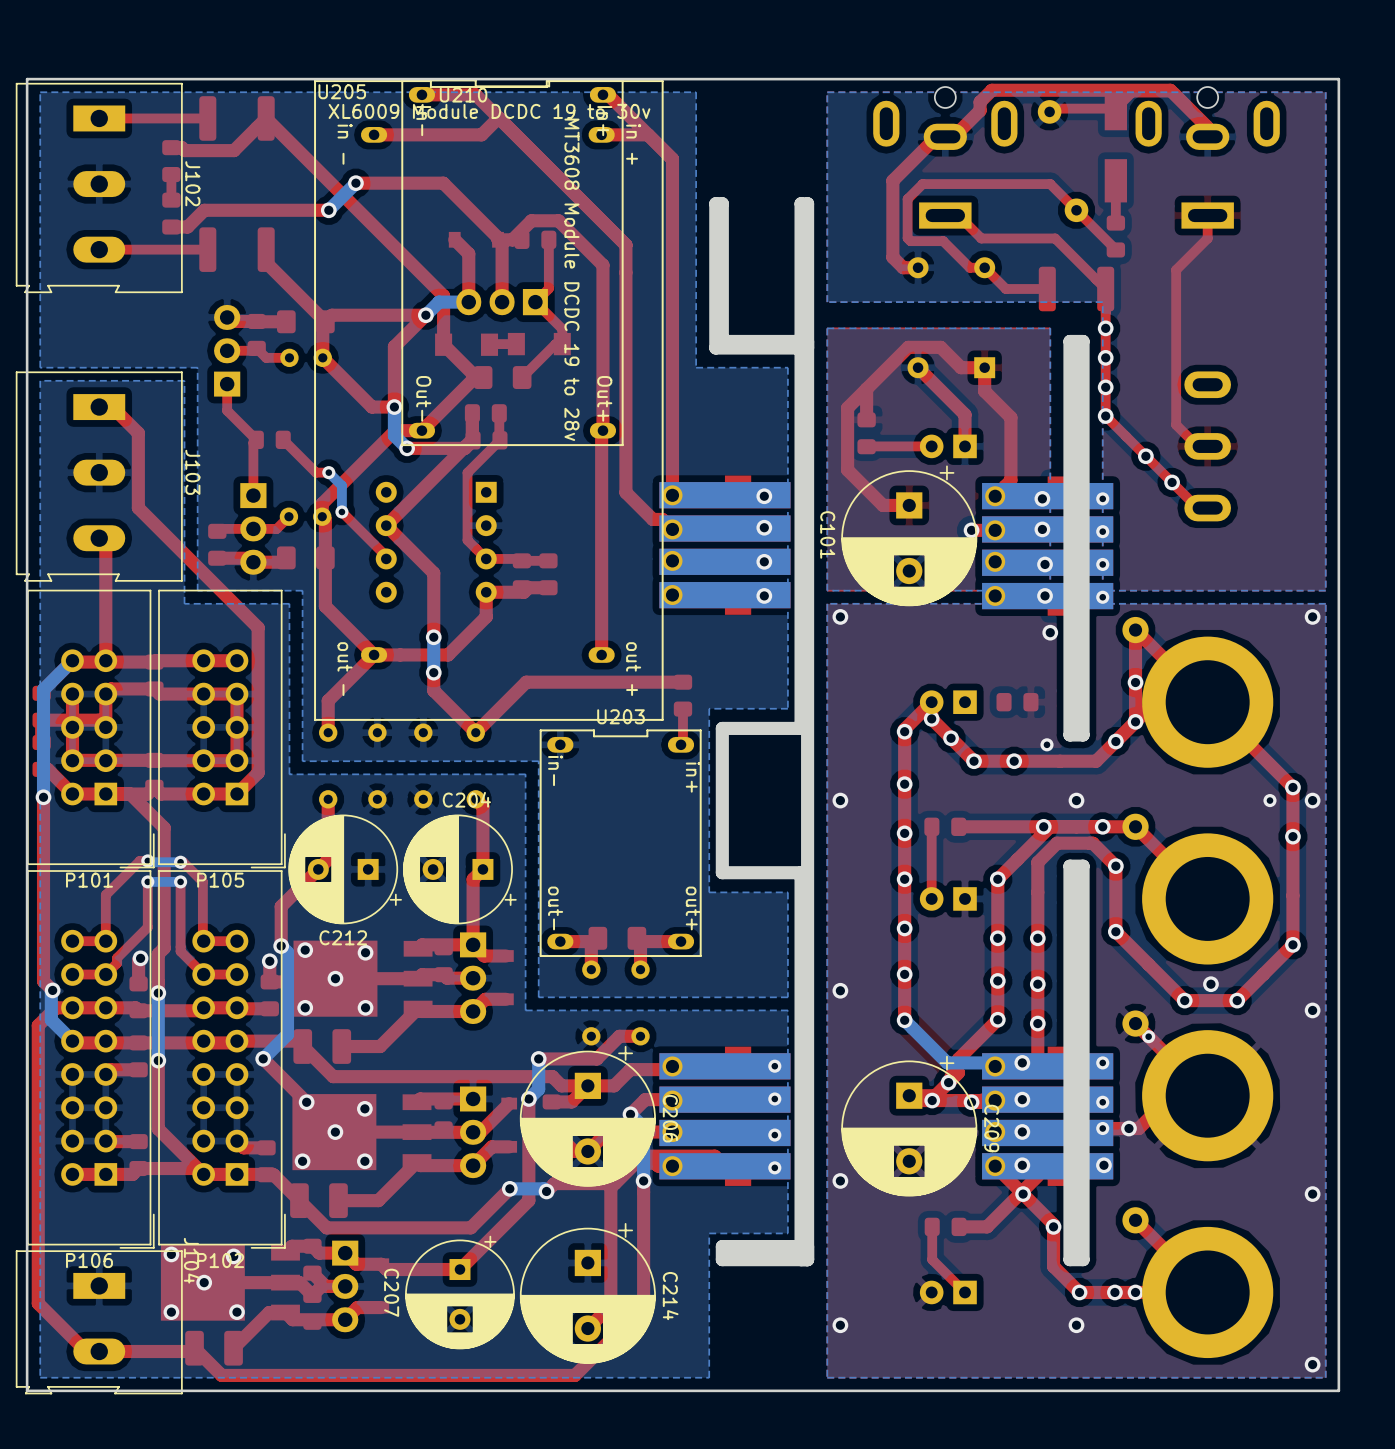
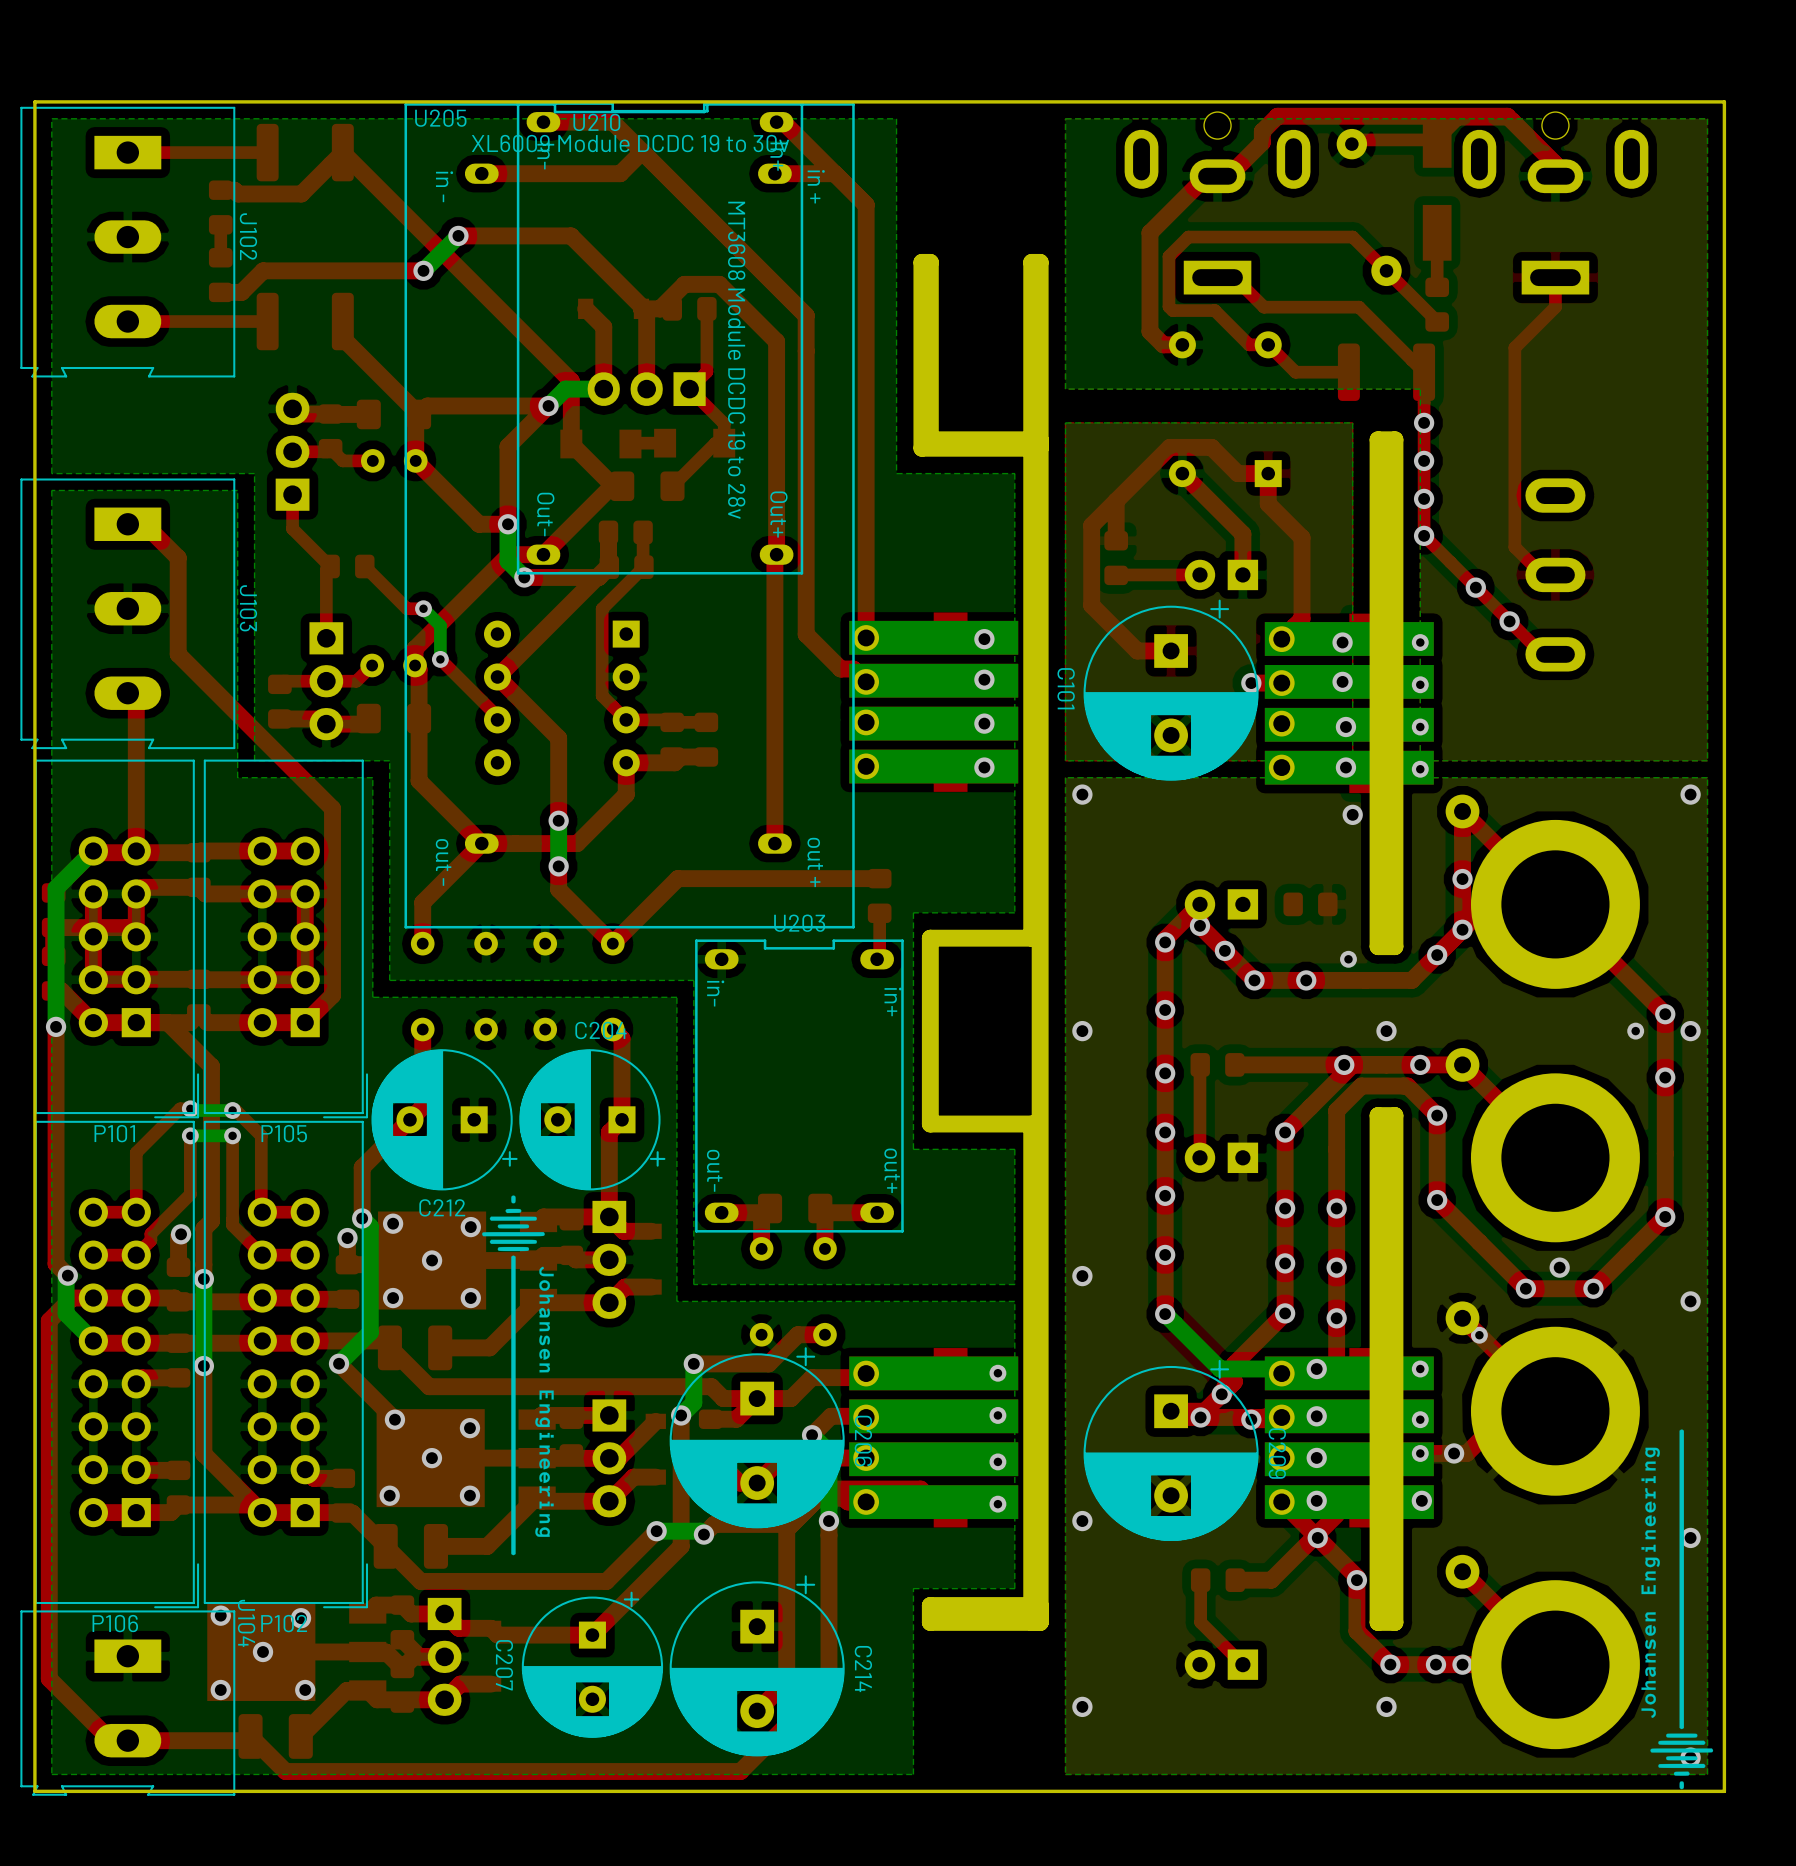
drawing: none -> [482, 1195, 554, 1556]
drawing: none -> [1641, 1429, 1714, 1790]

